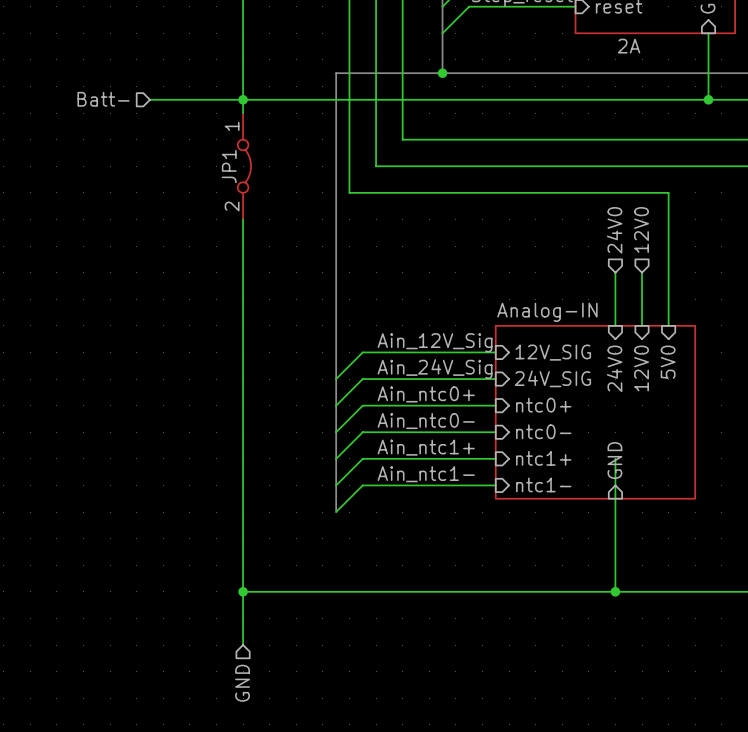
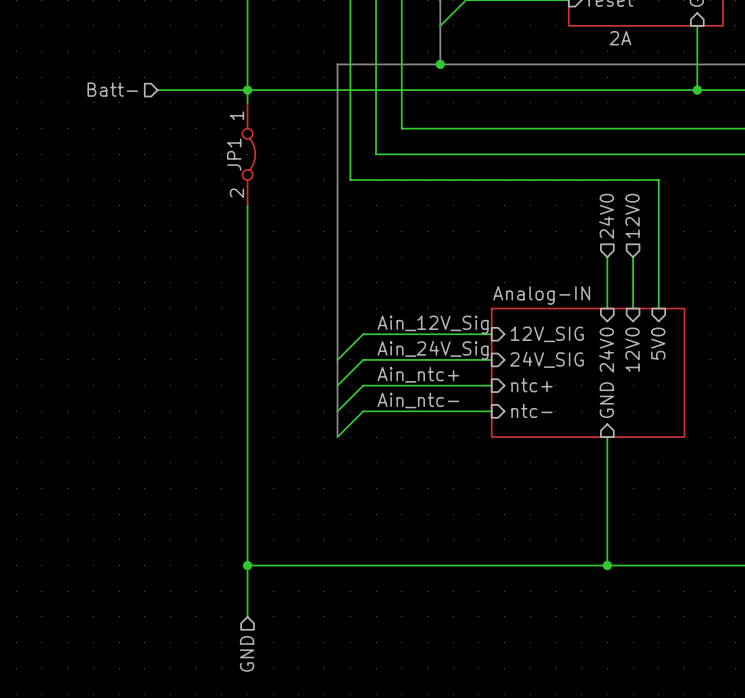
sheet Analog-IN: none -> (588, 372)
label: Ain_ntc0+ (426, 394) -> Ain_ntc+ (418, 374)
sheet pin: ntc0+ (543, 405) -> ntc+ (531, 385)
sheet Analog-IN: (595, 412) -> none
label: Ain_ntc0- (426, 421) -> Ain_ntc- (418, 400)
sheet pin: ntc0- (543, 431) -> ntc- (531, 410)
label: Ain_ntc1+ (426, 447) -> none
bus: (336, 458) (336, 512) -> none
wire: (495, 458) (362, 458) (336, 485) -> none
sheet pin: ntc1+ (543, 458) -> none
sheet pin position: GND (614, 460) -> GND (606, 400)
label: Ain_ntc1- (426, 474) -> none
sheet pin: ntc1- (543, 484) -> none
wire: (495, 485) (362, 485) (336, 512) -> none

